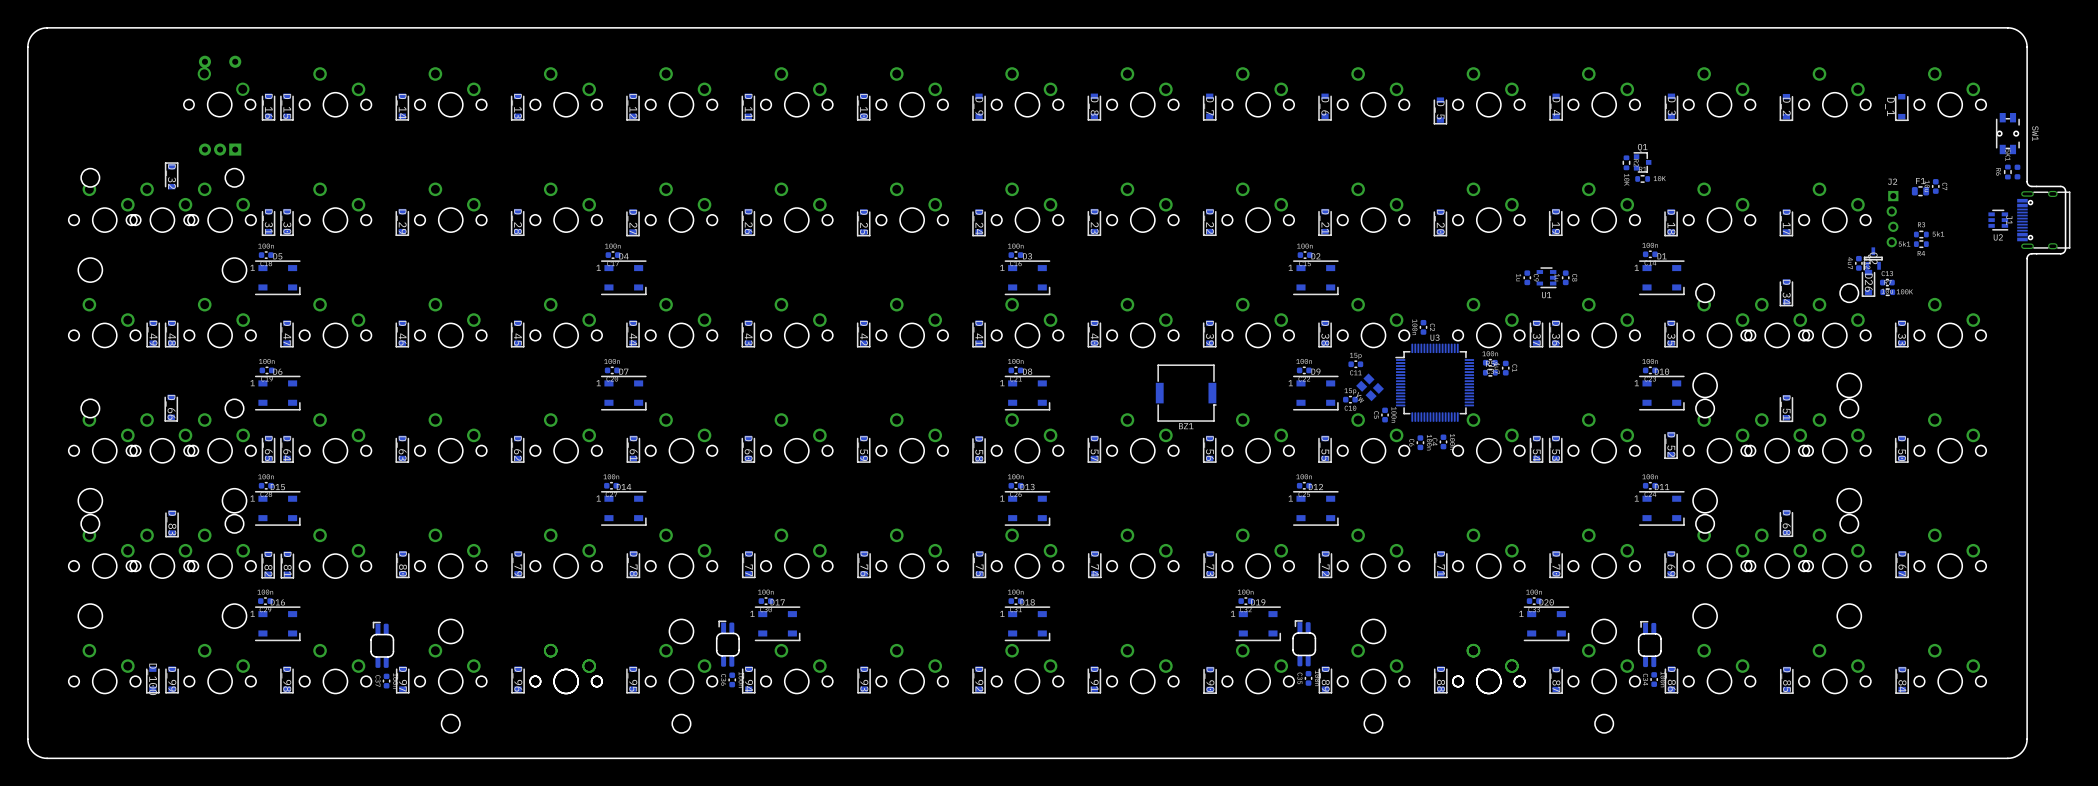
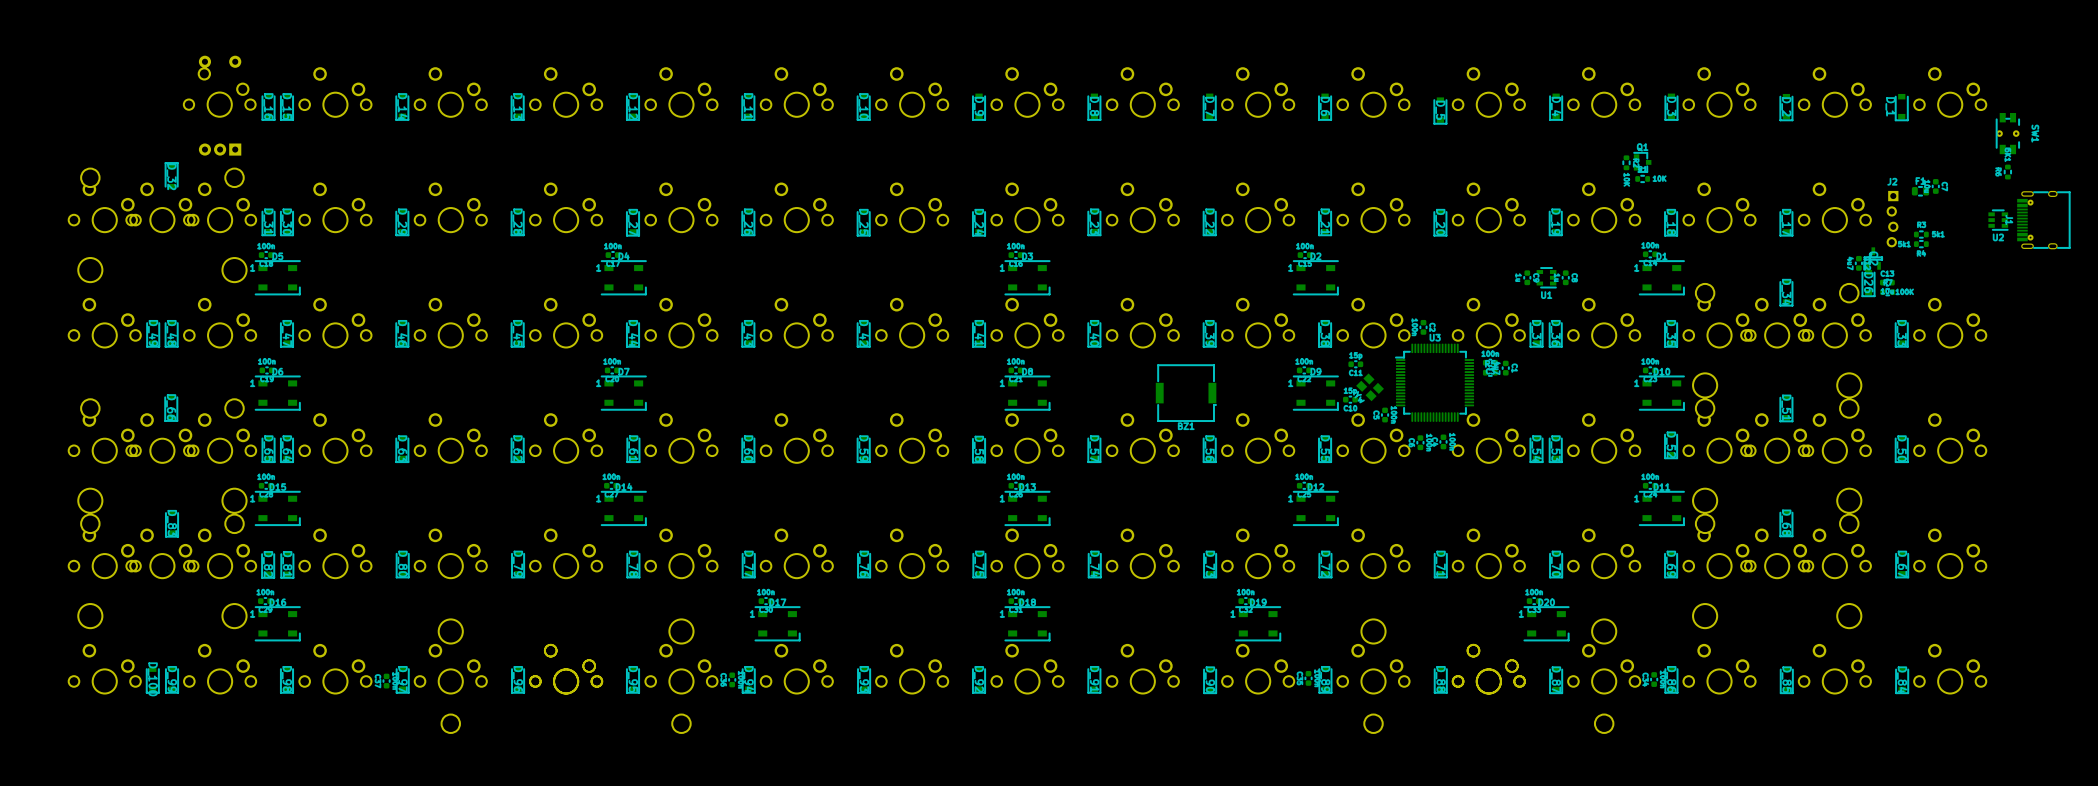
board edge: (2007, 27) (39, 29) (31, 35) (27, 47) (29, 746) (37, 755) (47, 758) (2015, 756) (2024, 748) (2027, 739) (2027, 257) (2031, 253) (2061, 253) (2064, 251) (2065, 191) (2061, 186) (2031, 186) (2027, 183) (2026, 44) (2021, 33) (2007, 27) -> none
part: (2017, 172) -> none
part: (727, 643) -> none
part: (1304, 643) -> none
part: (382, 644) -> none
part: (1649, 644) -> none

